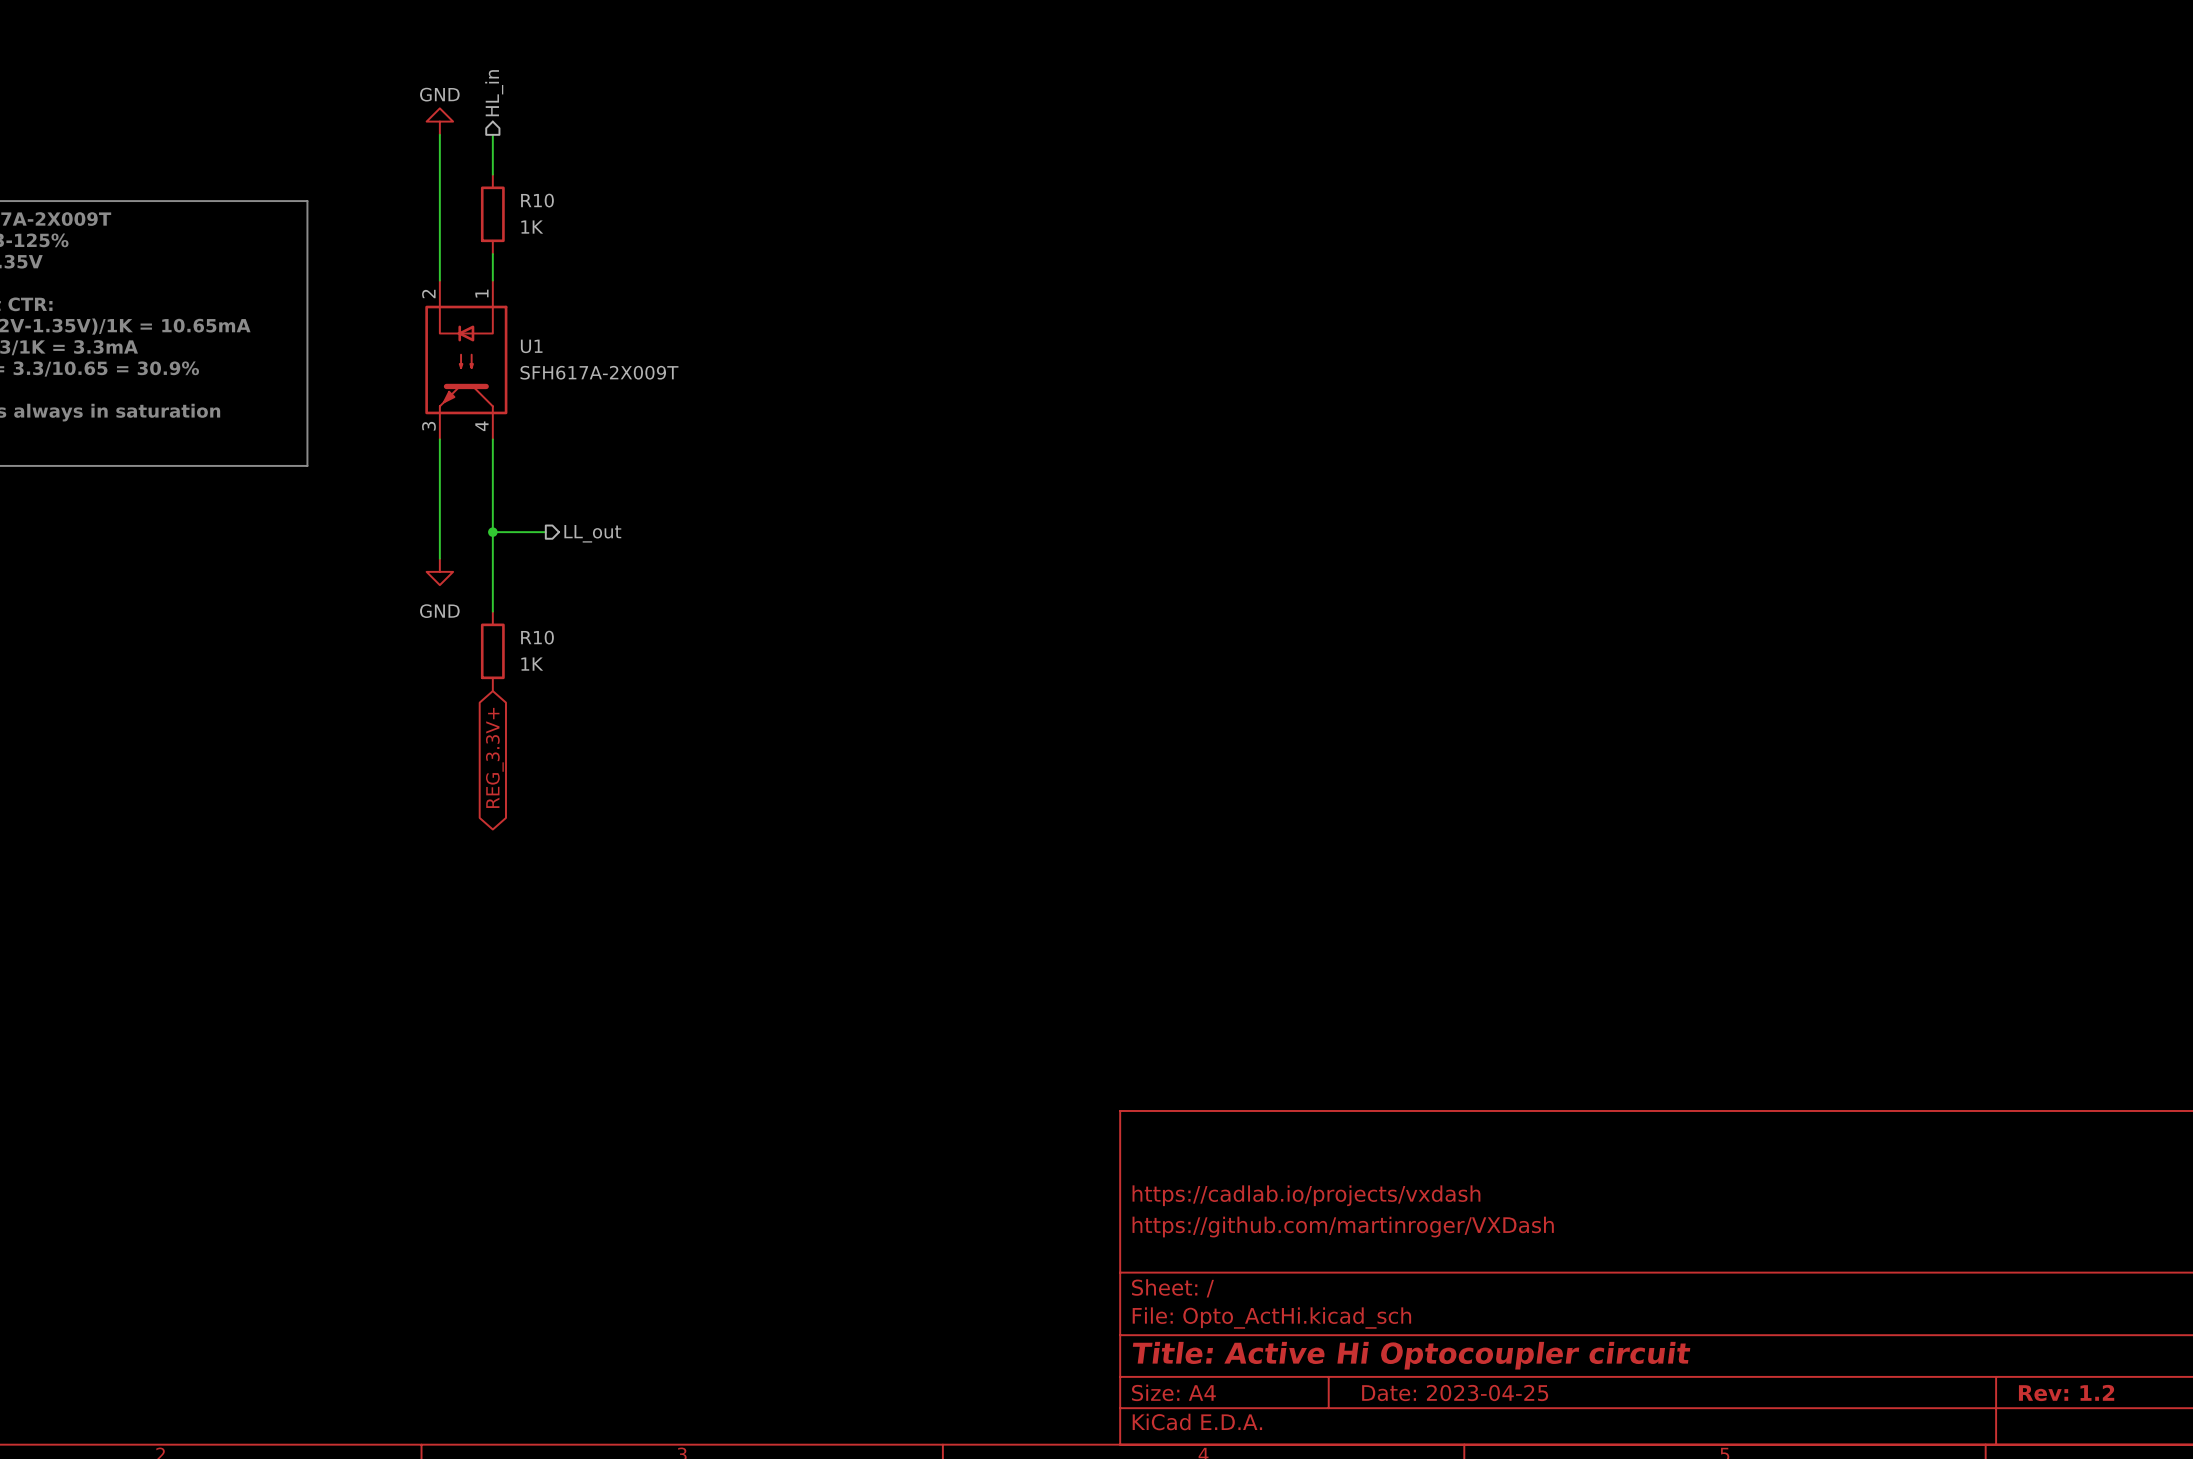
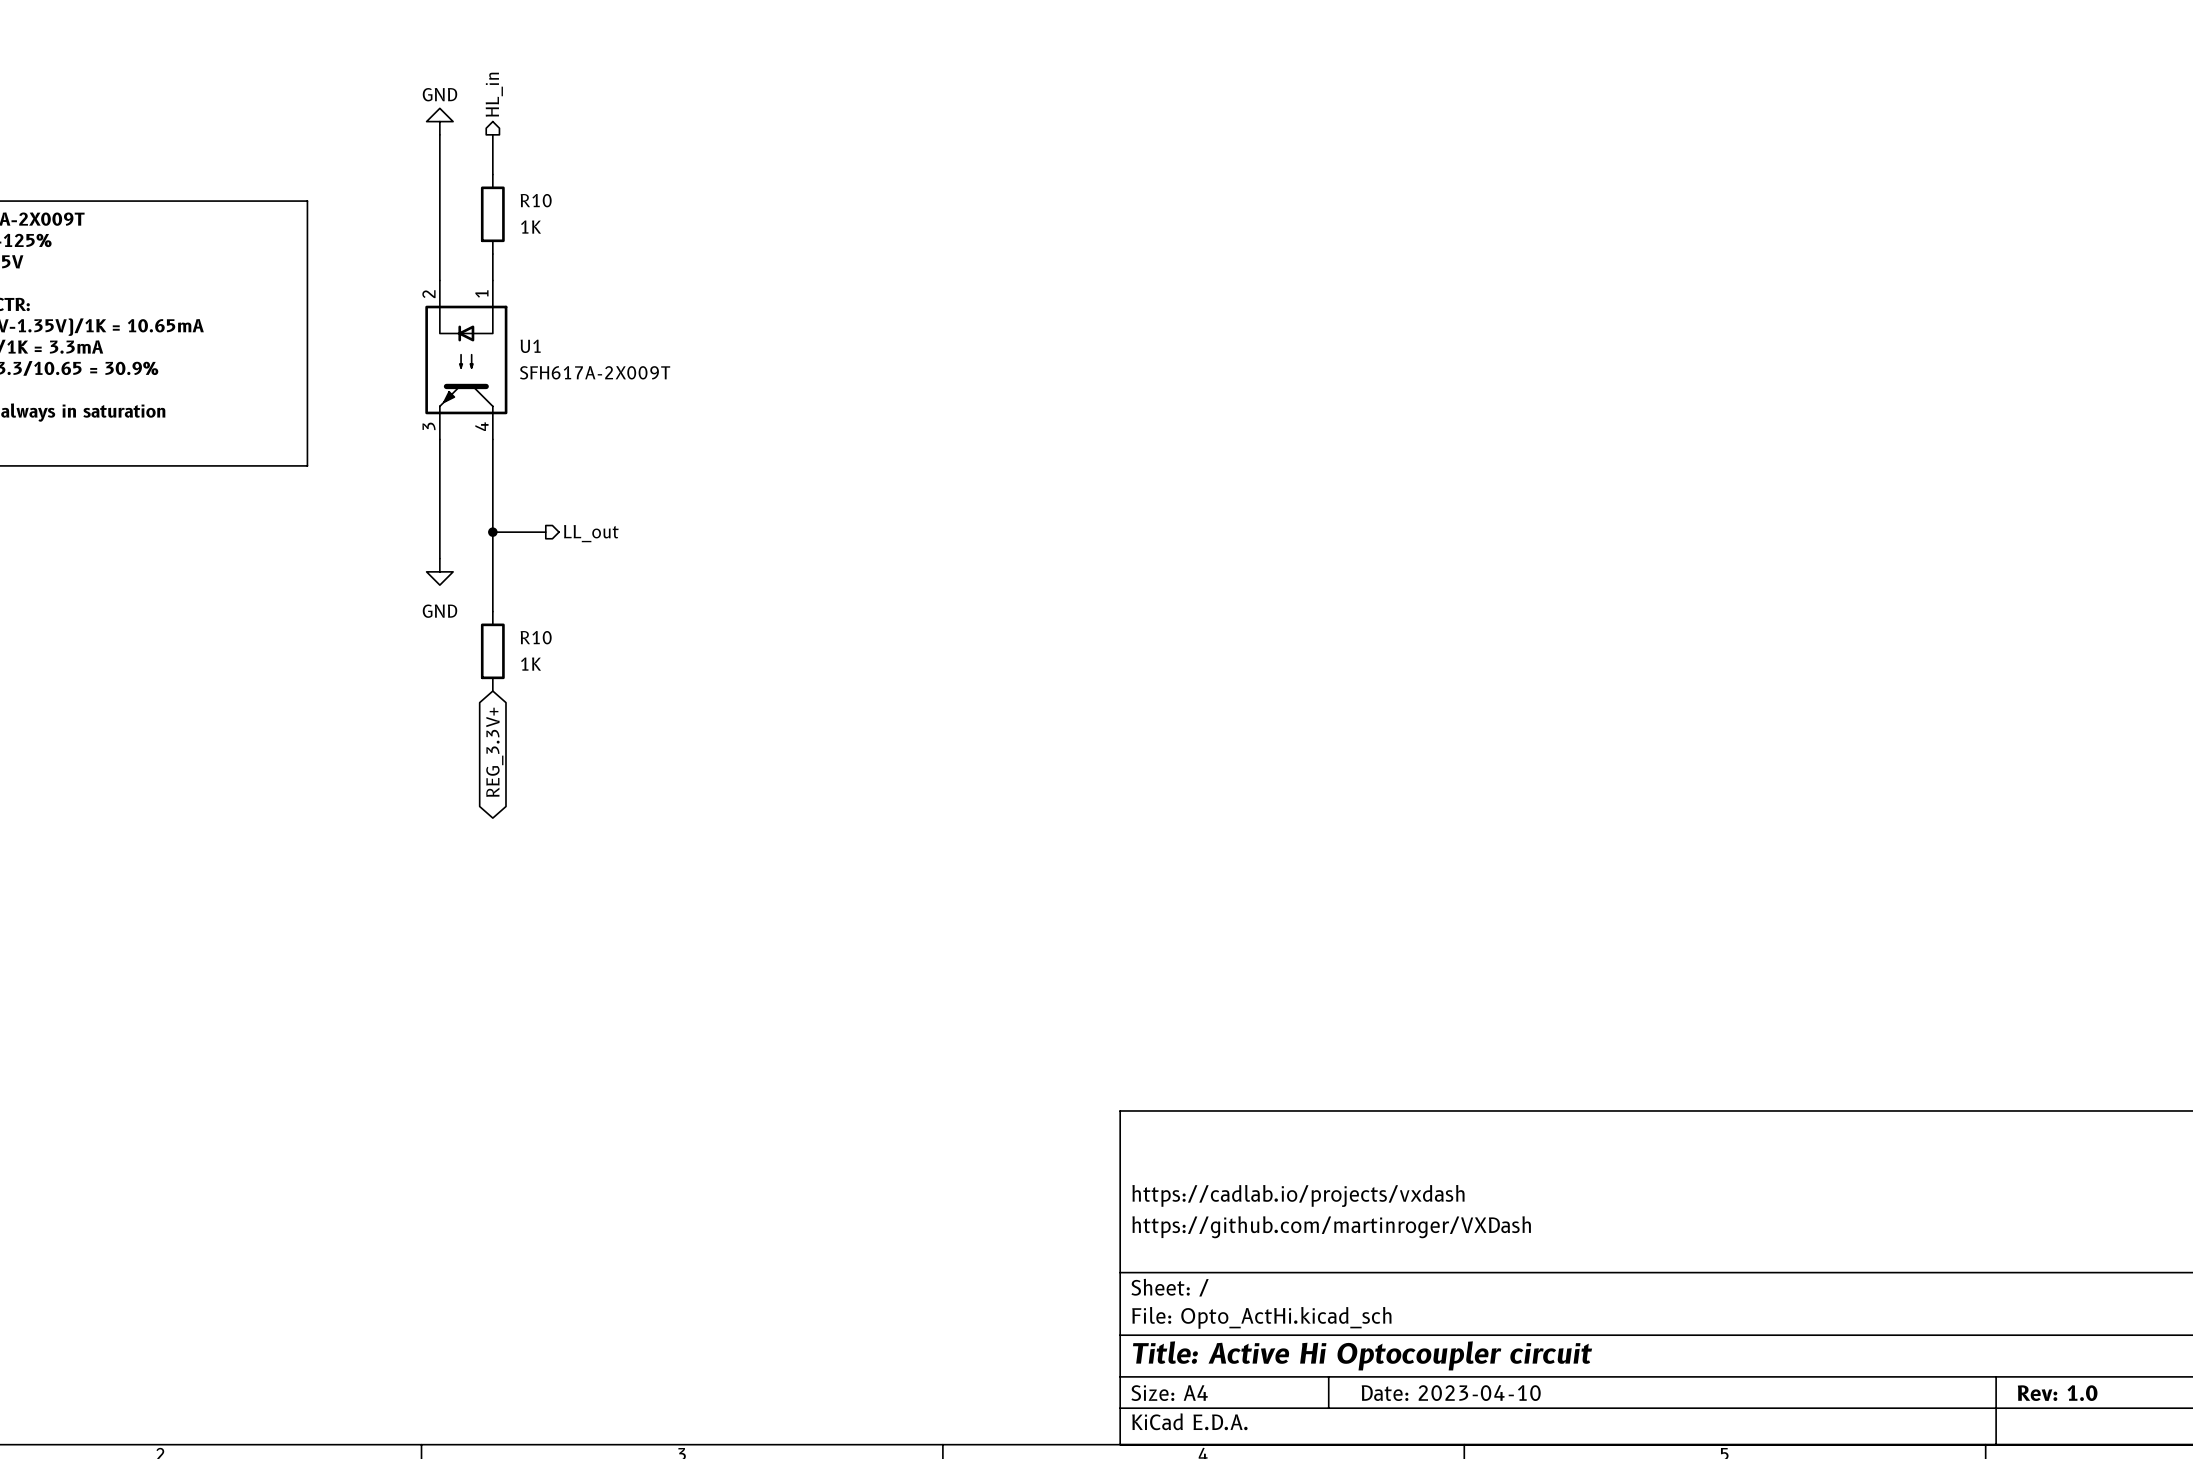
title block: Date: 2023-04-25 (1455, 1393) -> Date: 2023-04-10 (1451, 1393)
title block: Rev: 1.2 (2066, 1393) -> Rev: 1.0 (2057, 1393)

